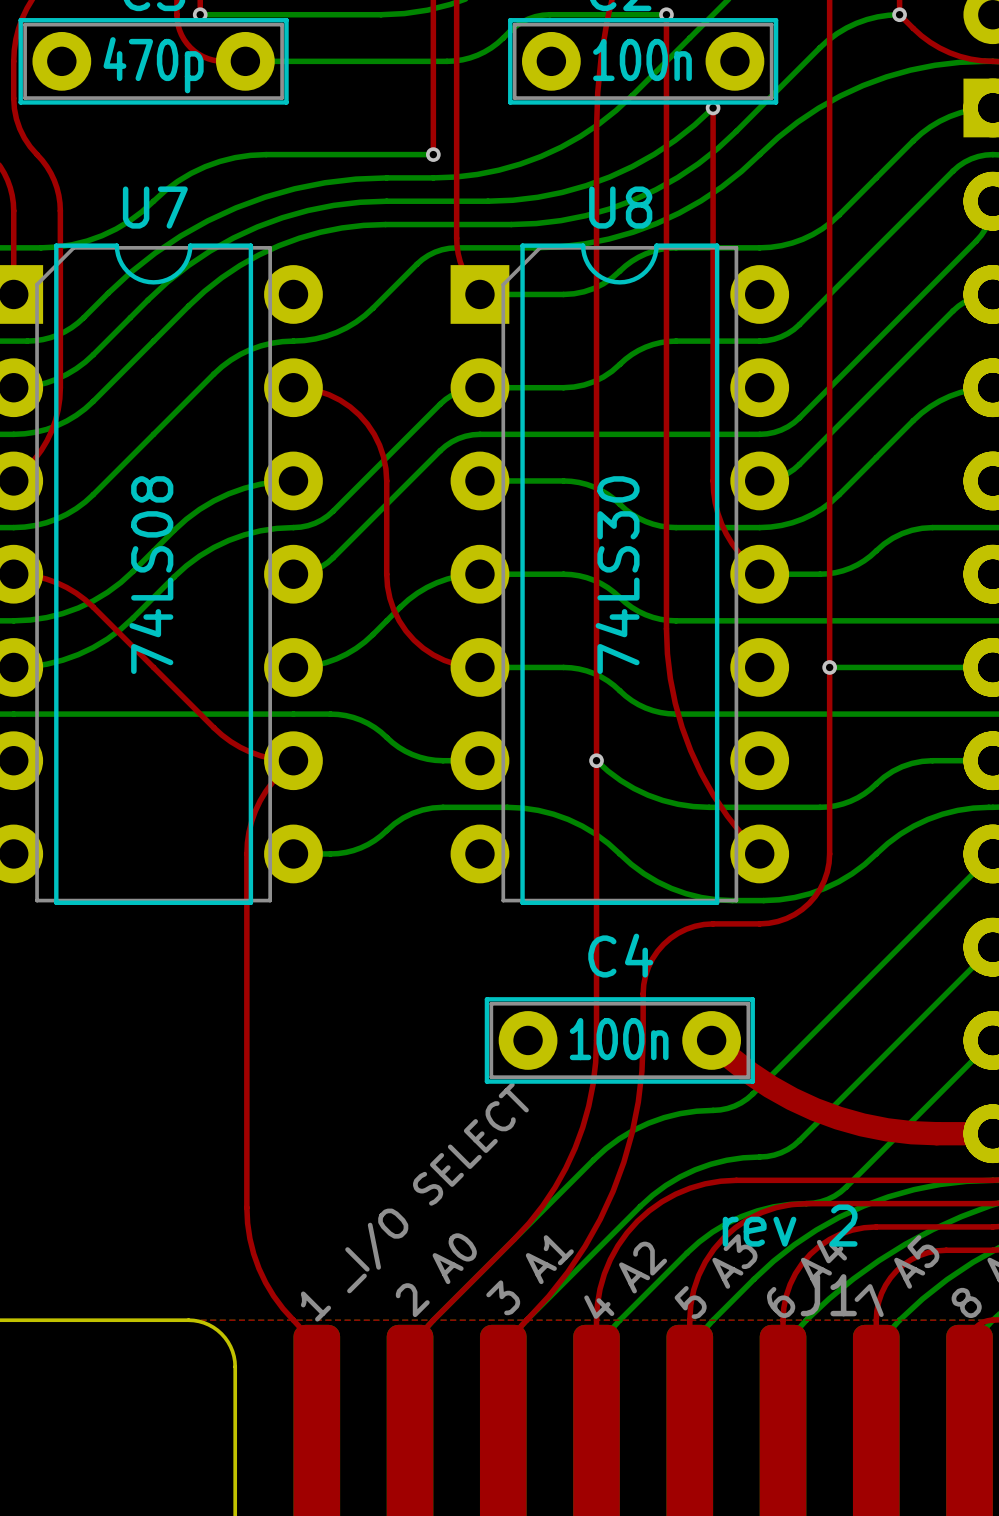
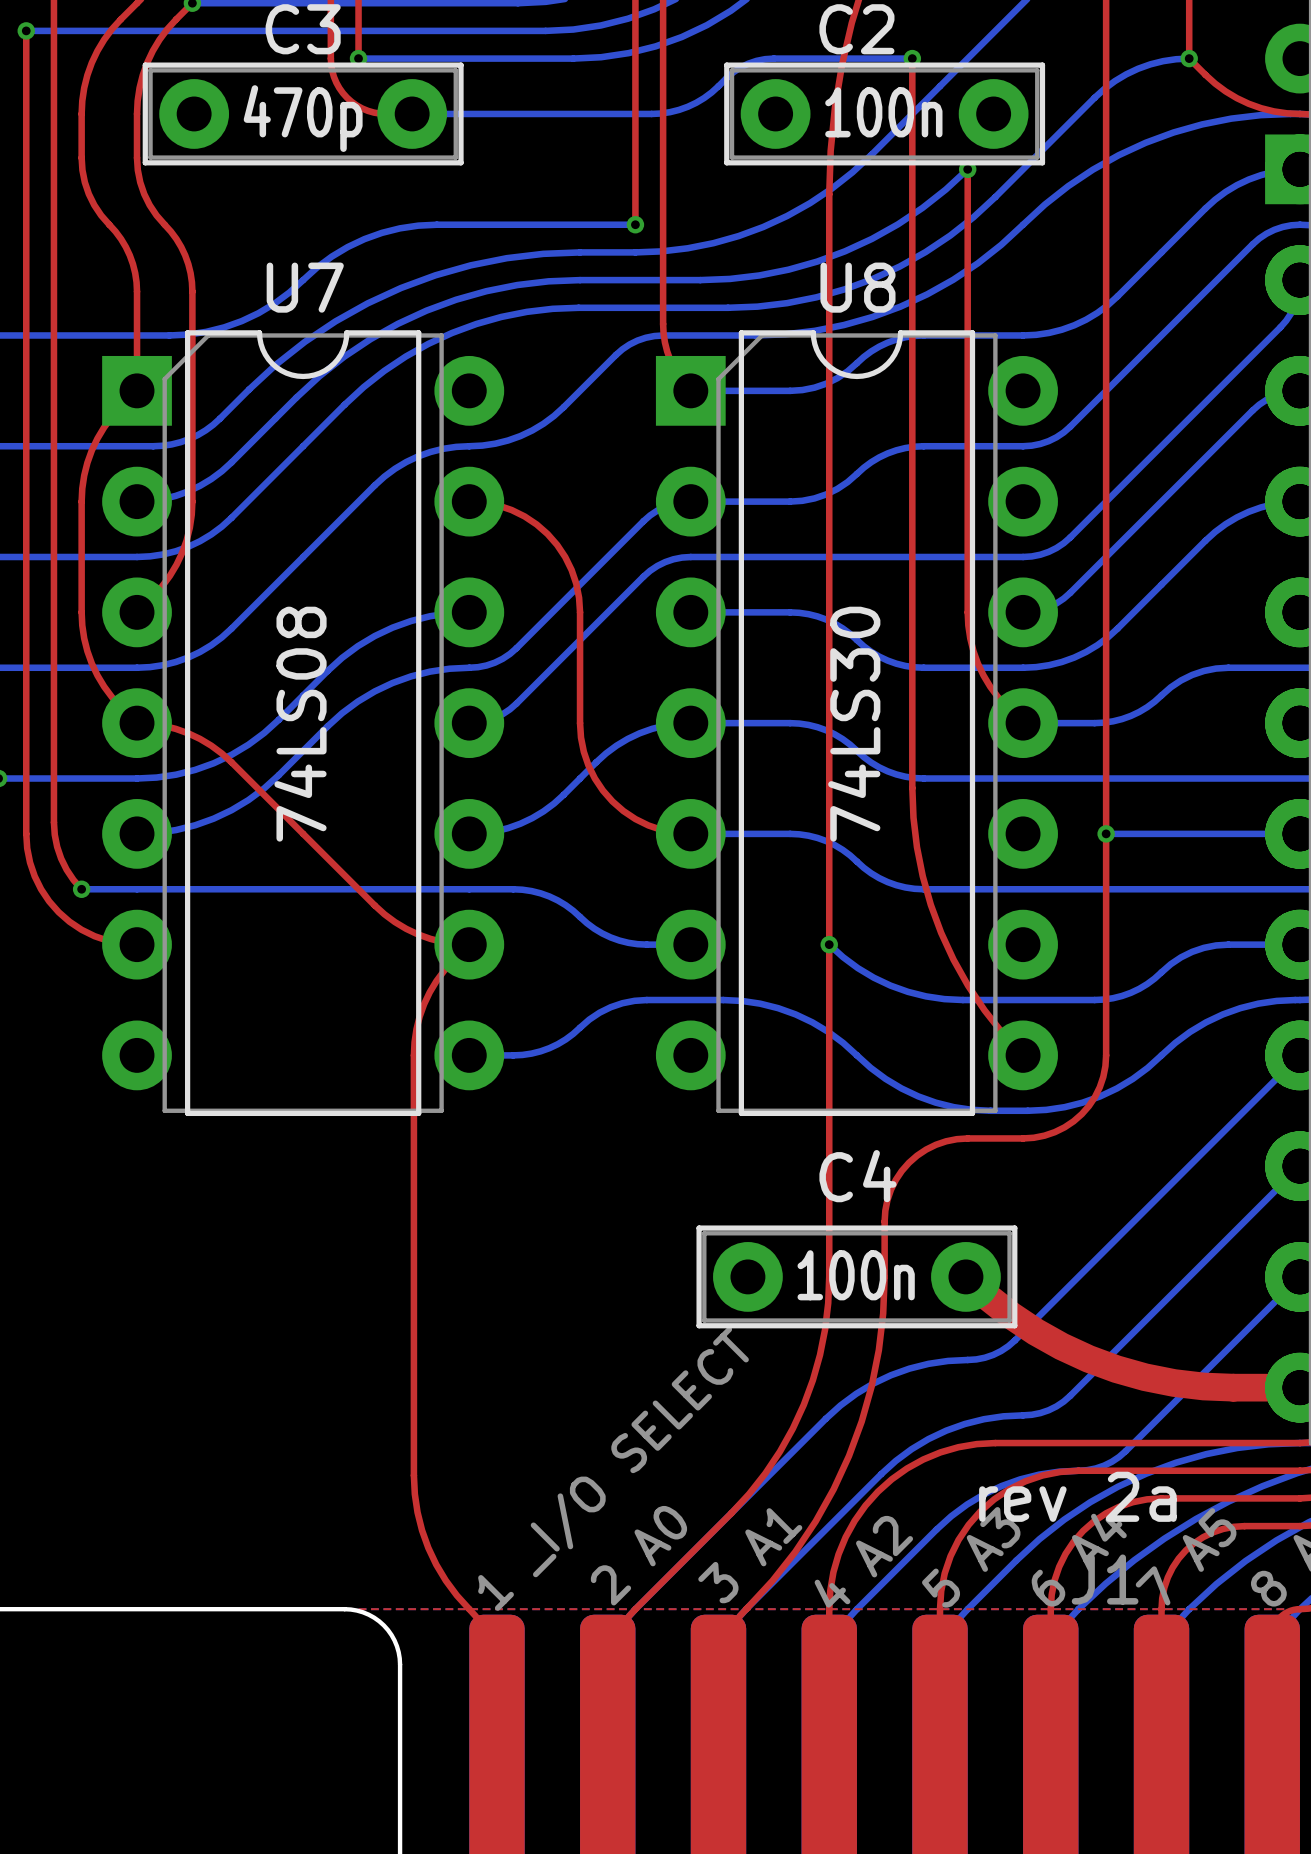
text: rev 2 (790, 1225) -> rev 2a (1077, 1496)

